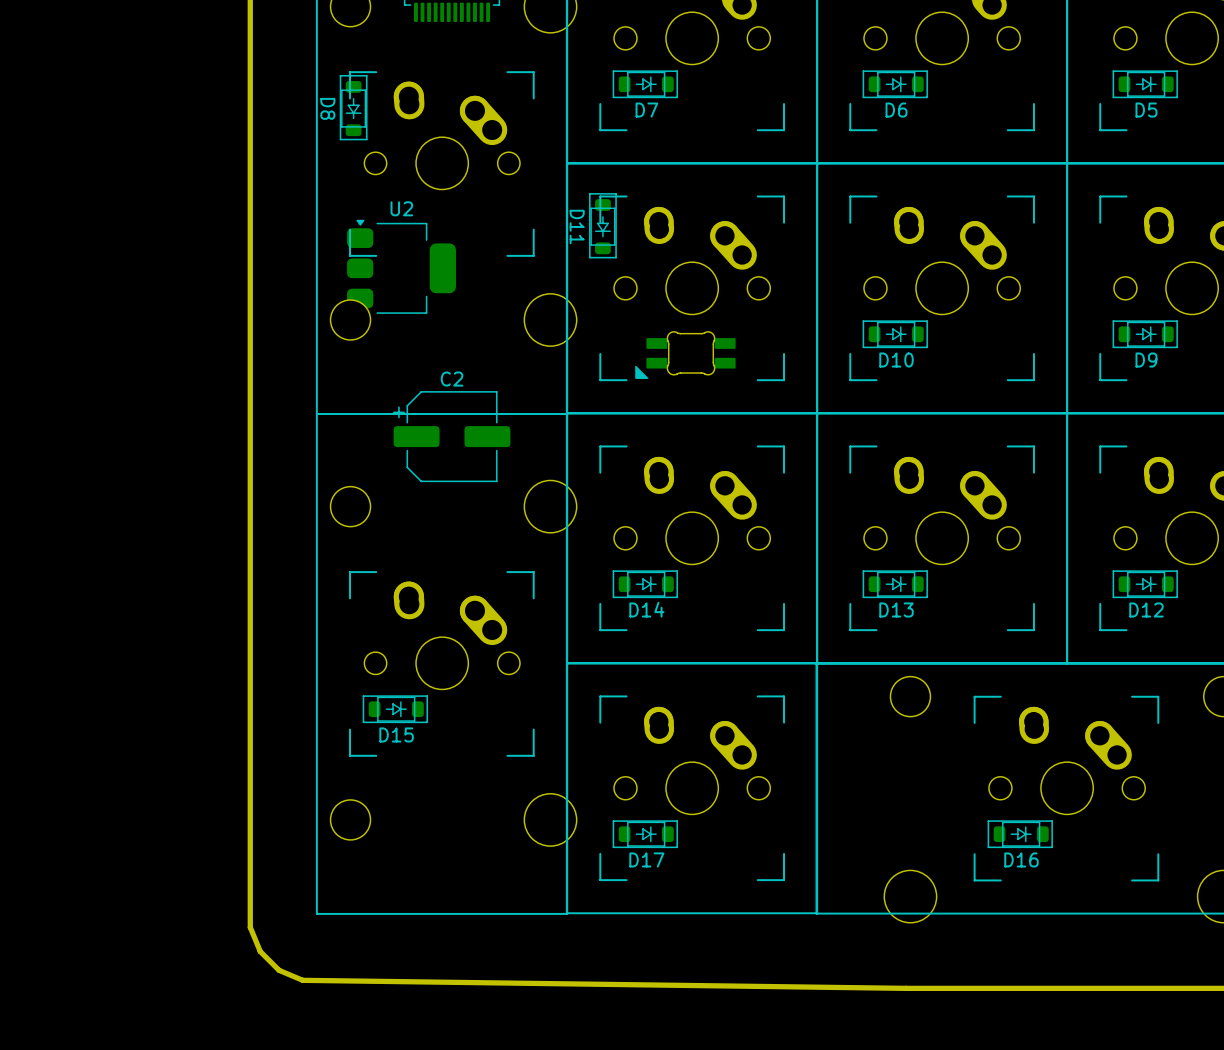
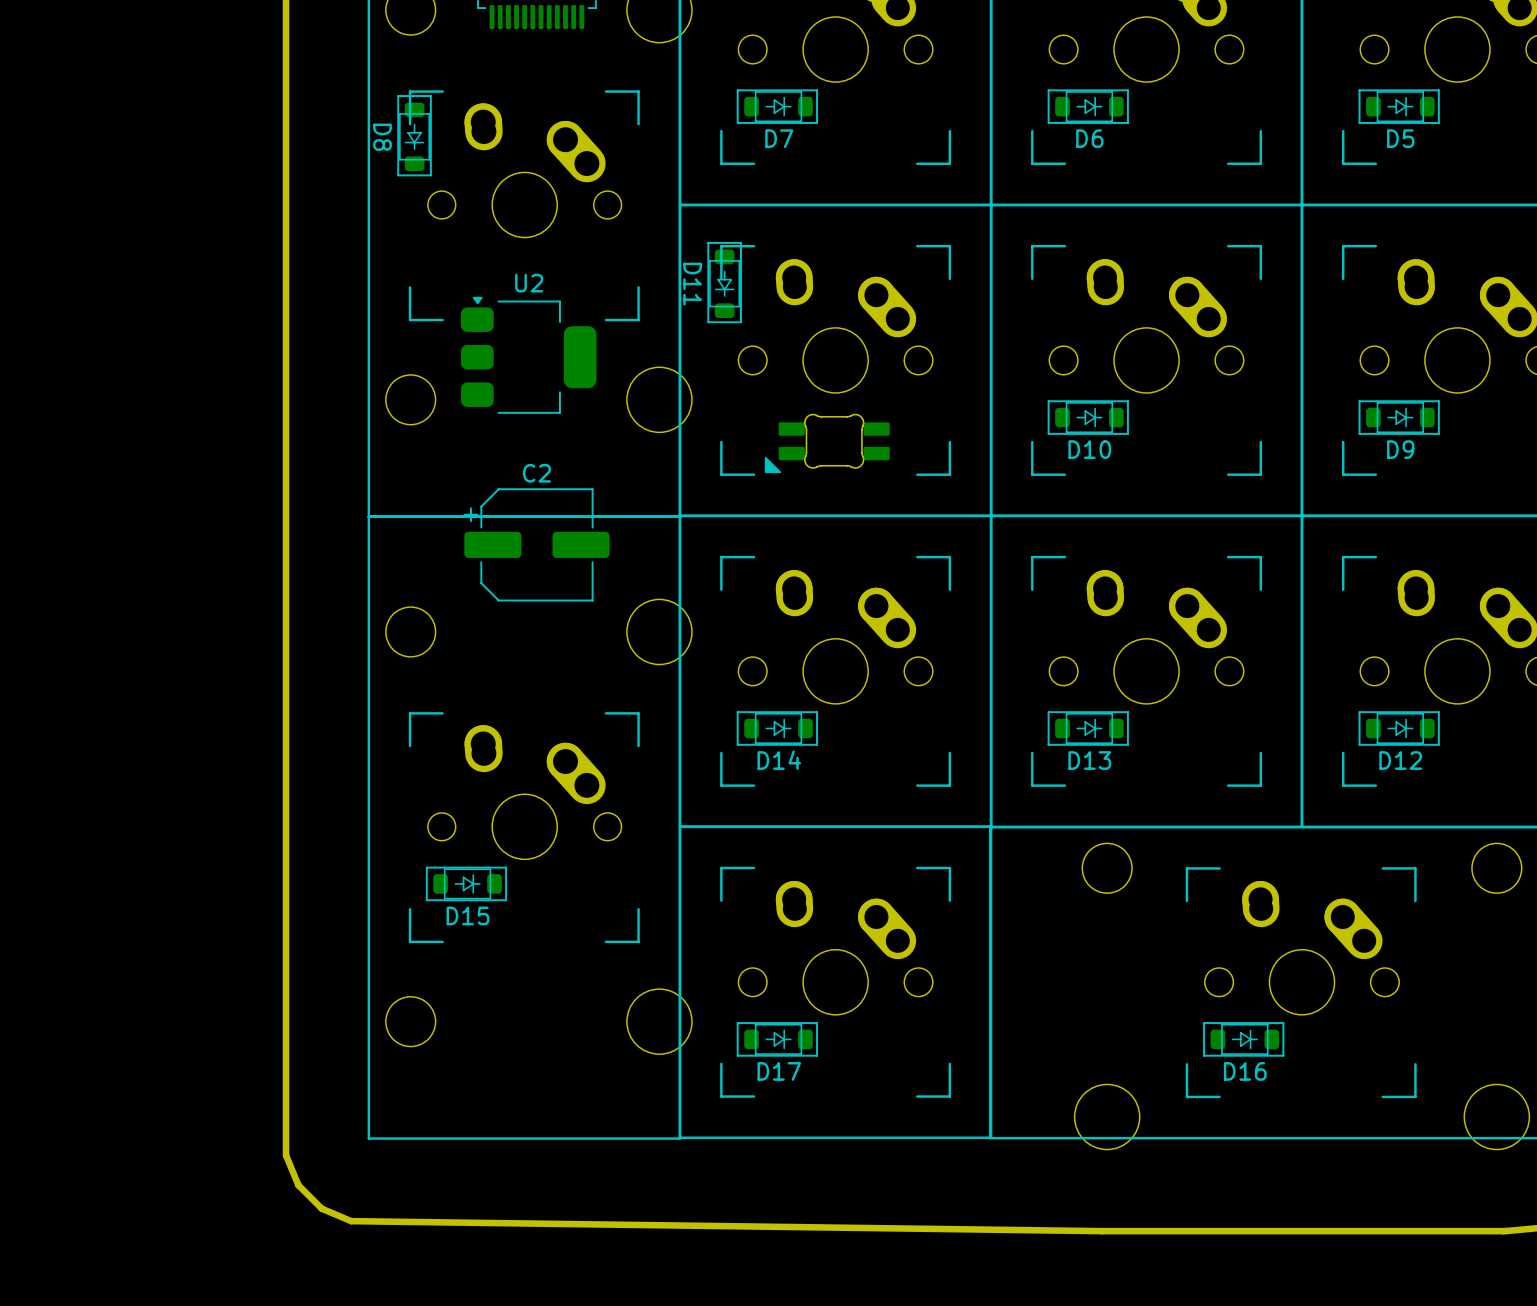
U2 position: (401, 266) -> (528, 355)

